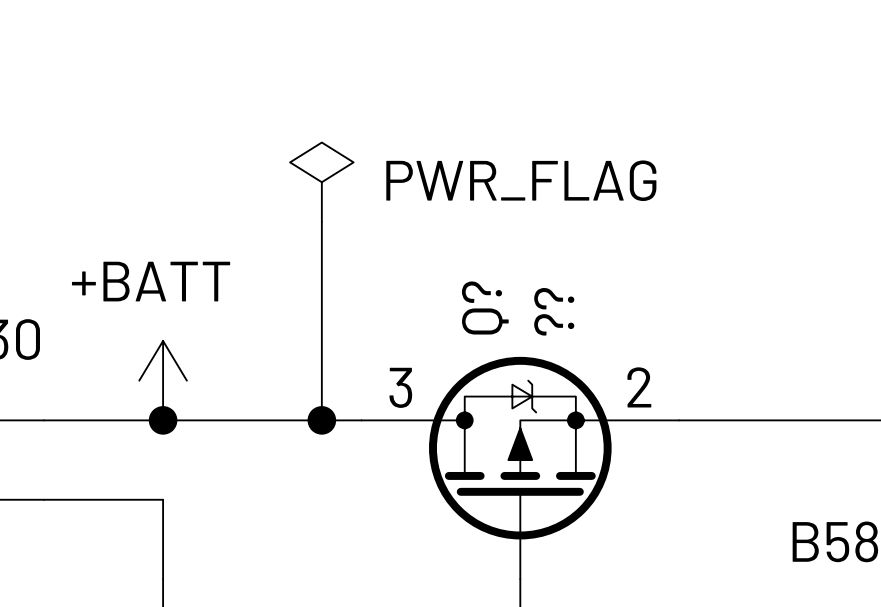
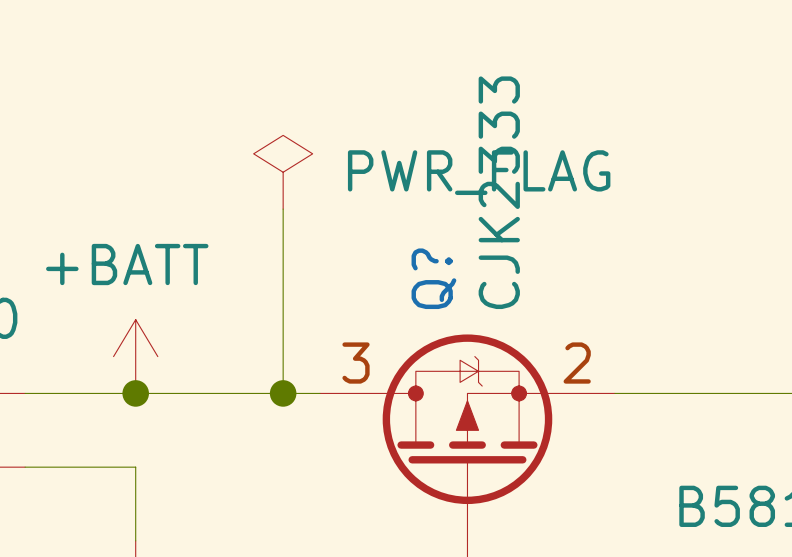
Q? value: ?? (554, 311) -> CJK2333 (499, 192)

